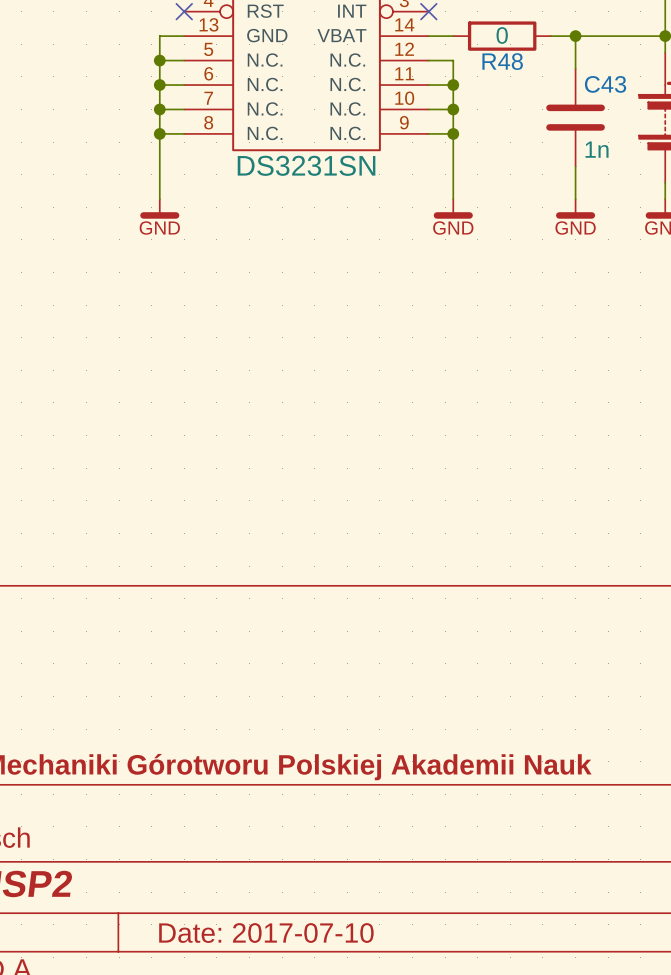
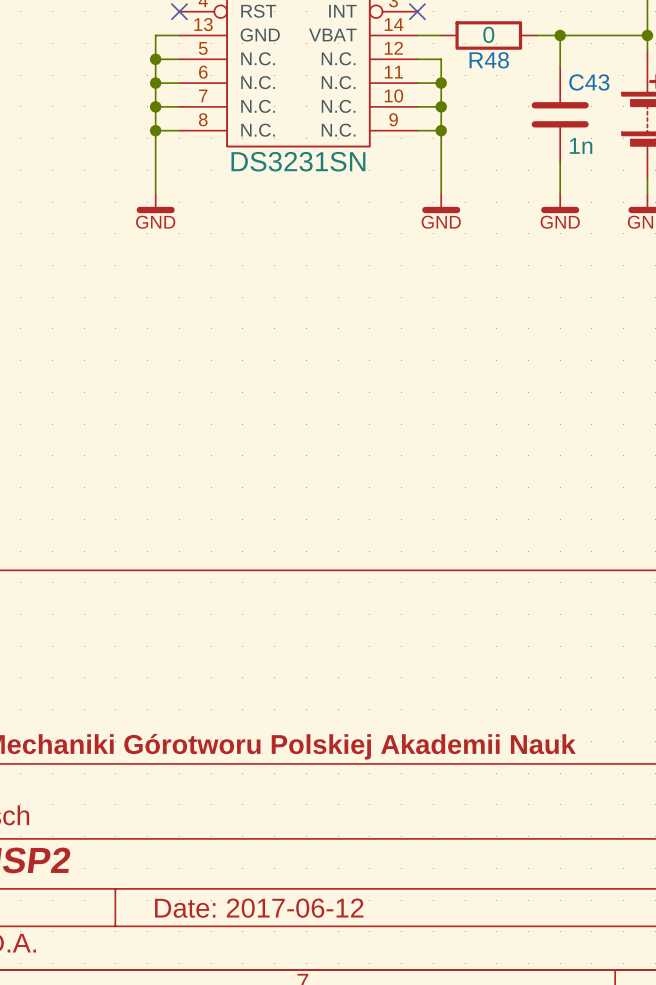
title block: Date: 2017-07-10 (266, 933) -> Date: 2017-06-12 (259, 908)

